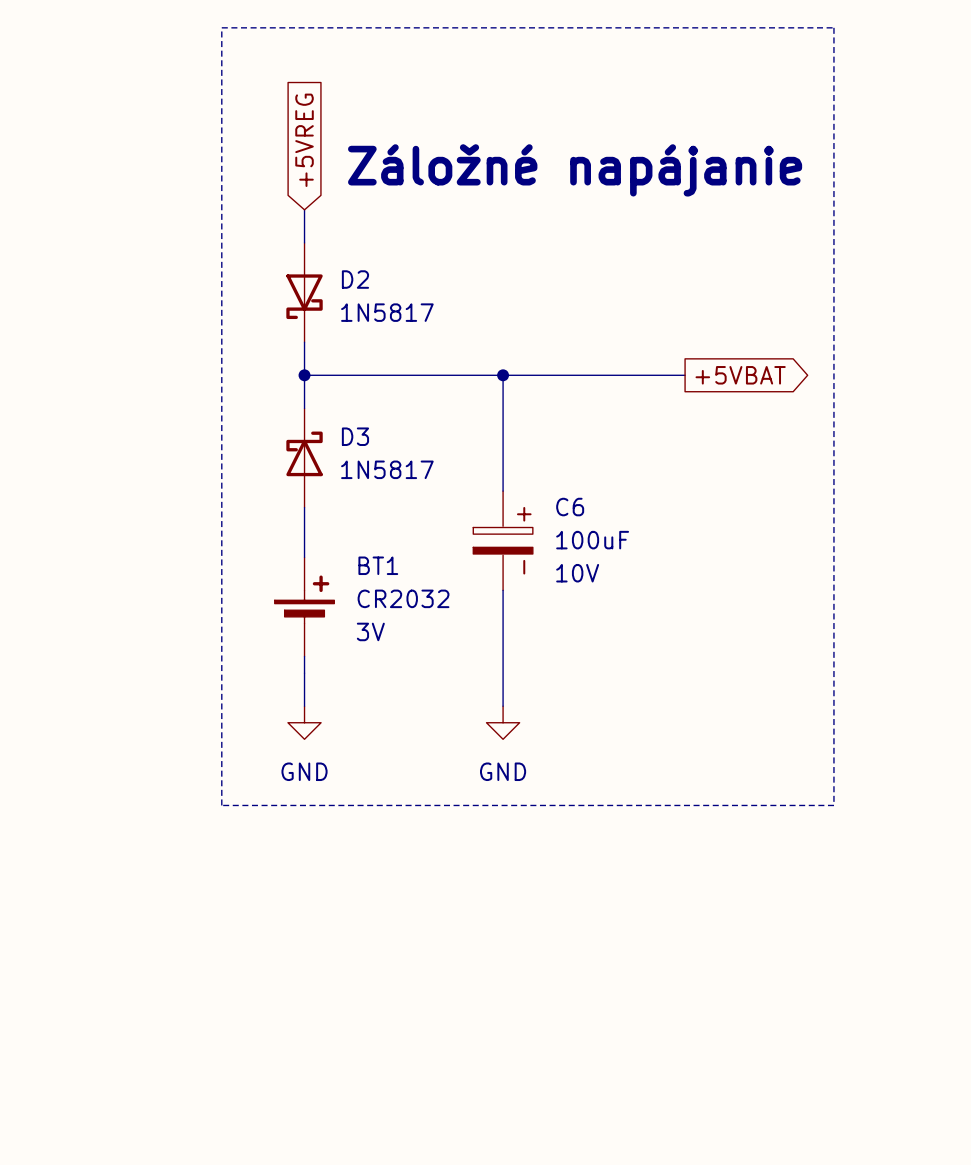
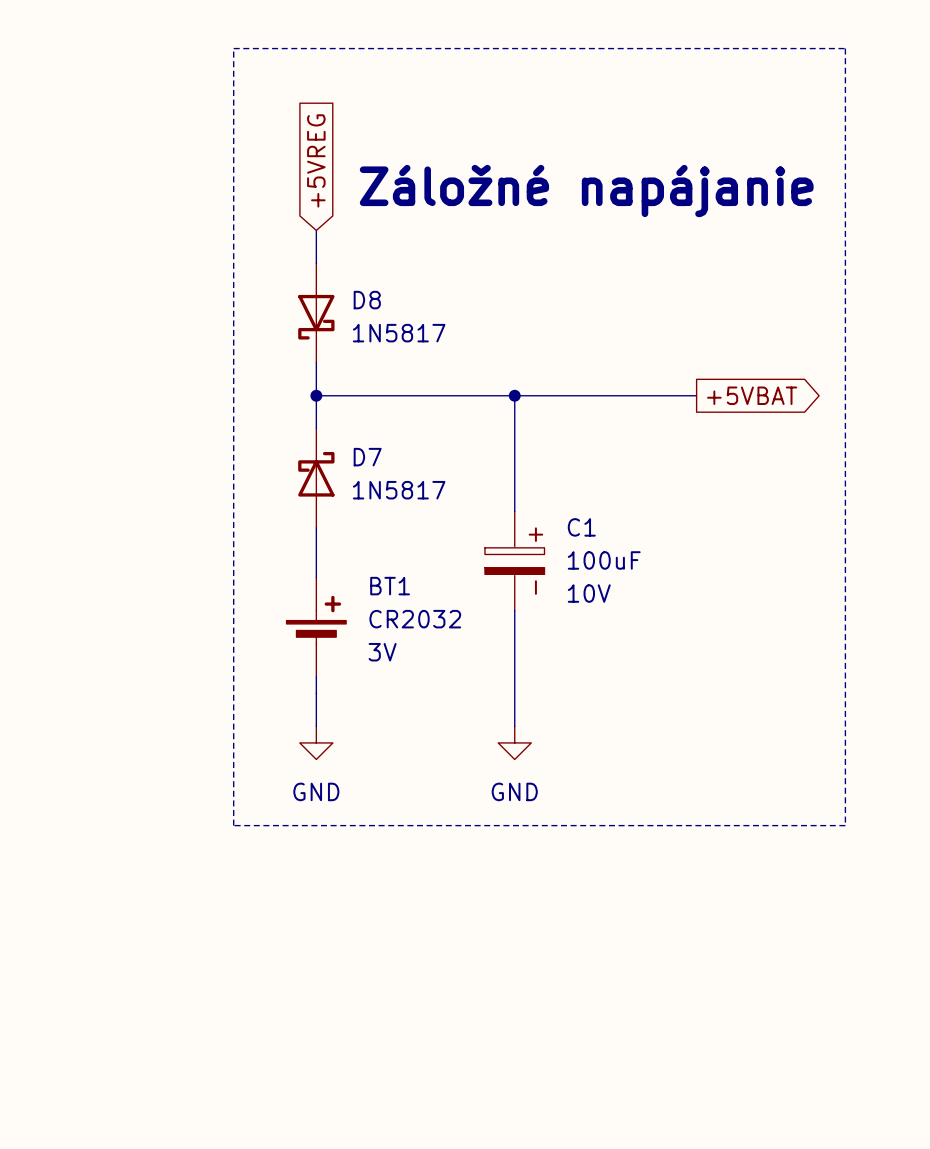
D2 name: D2 (355, 279) -> D8 (367, 300)
D3 name: D3 (355, 436) -> D7 (367, 457)
C6 name: C6 (570, 507) -> C1 (581, 527)

